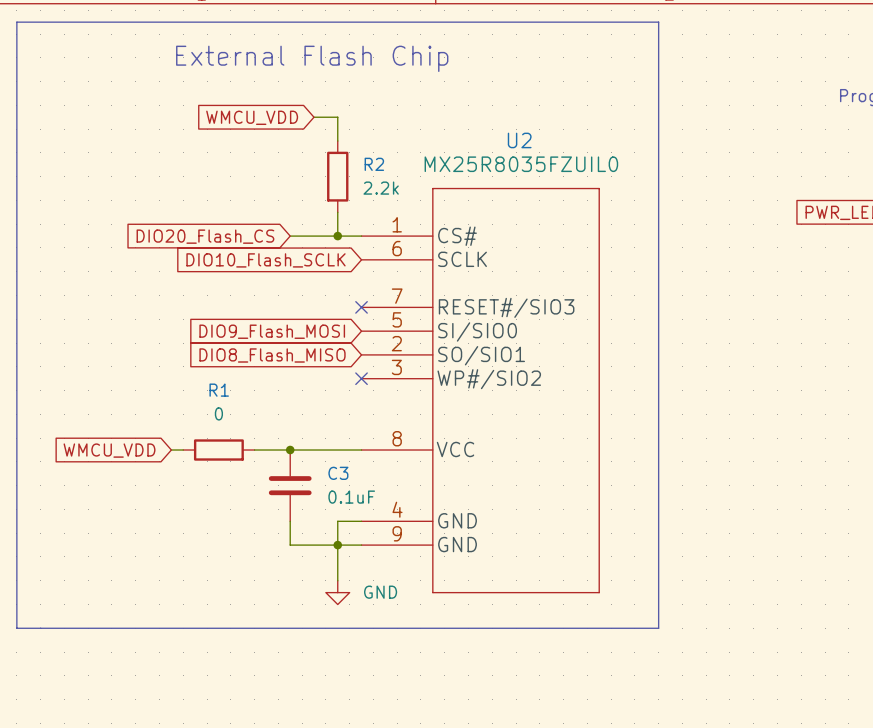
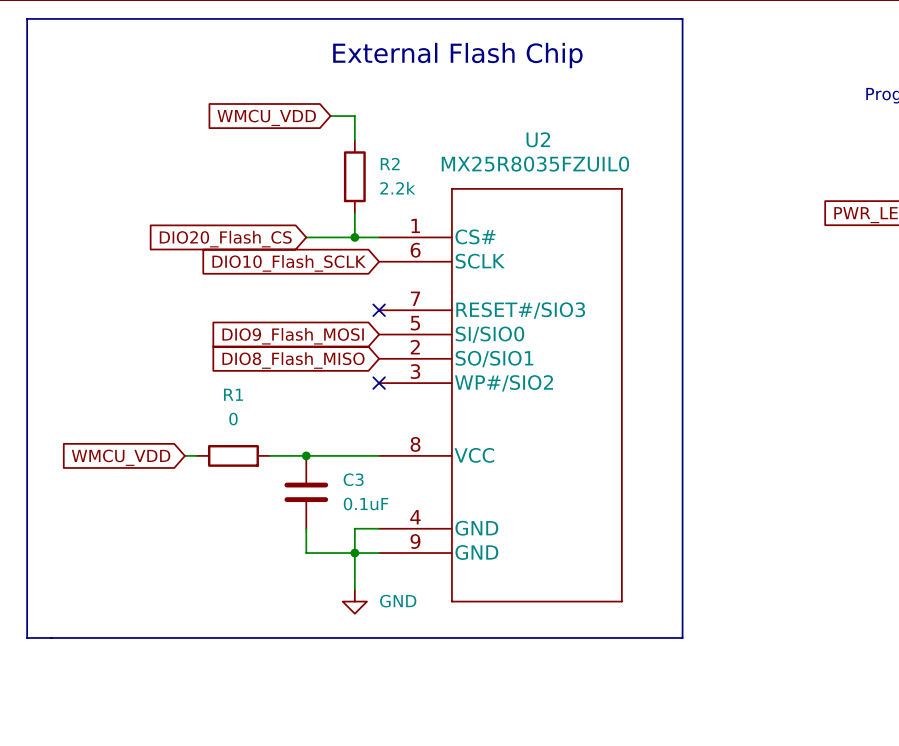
text position: External Flash Chip (312, 58) -> External Flash Chip (457, 55)

